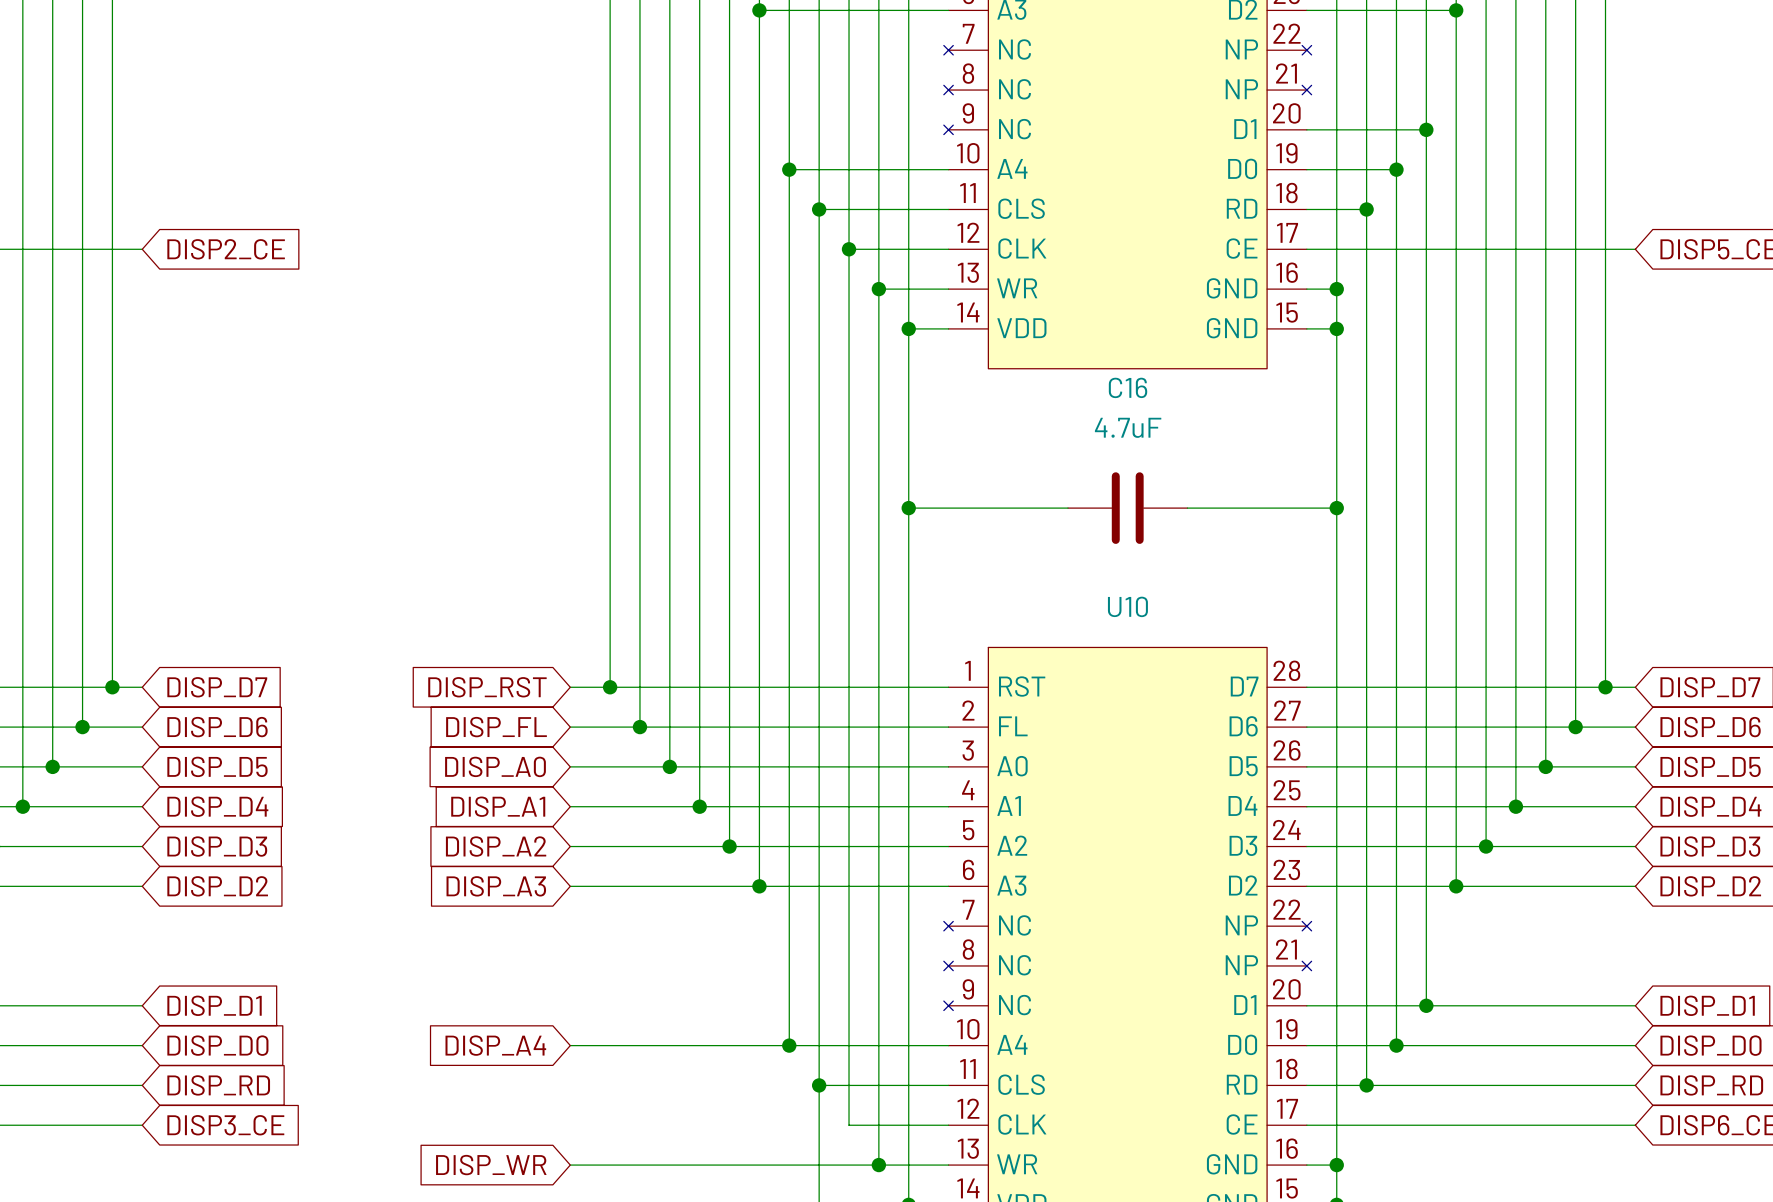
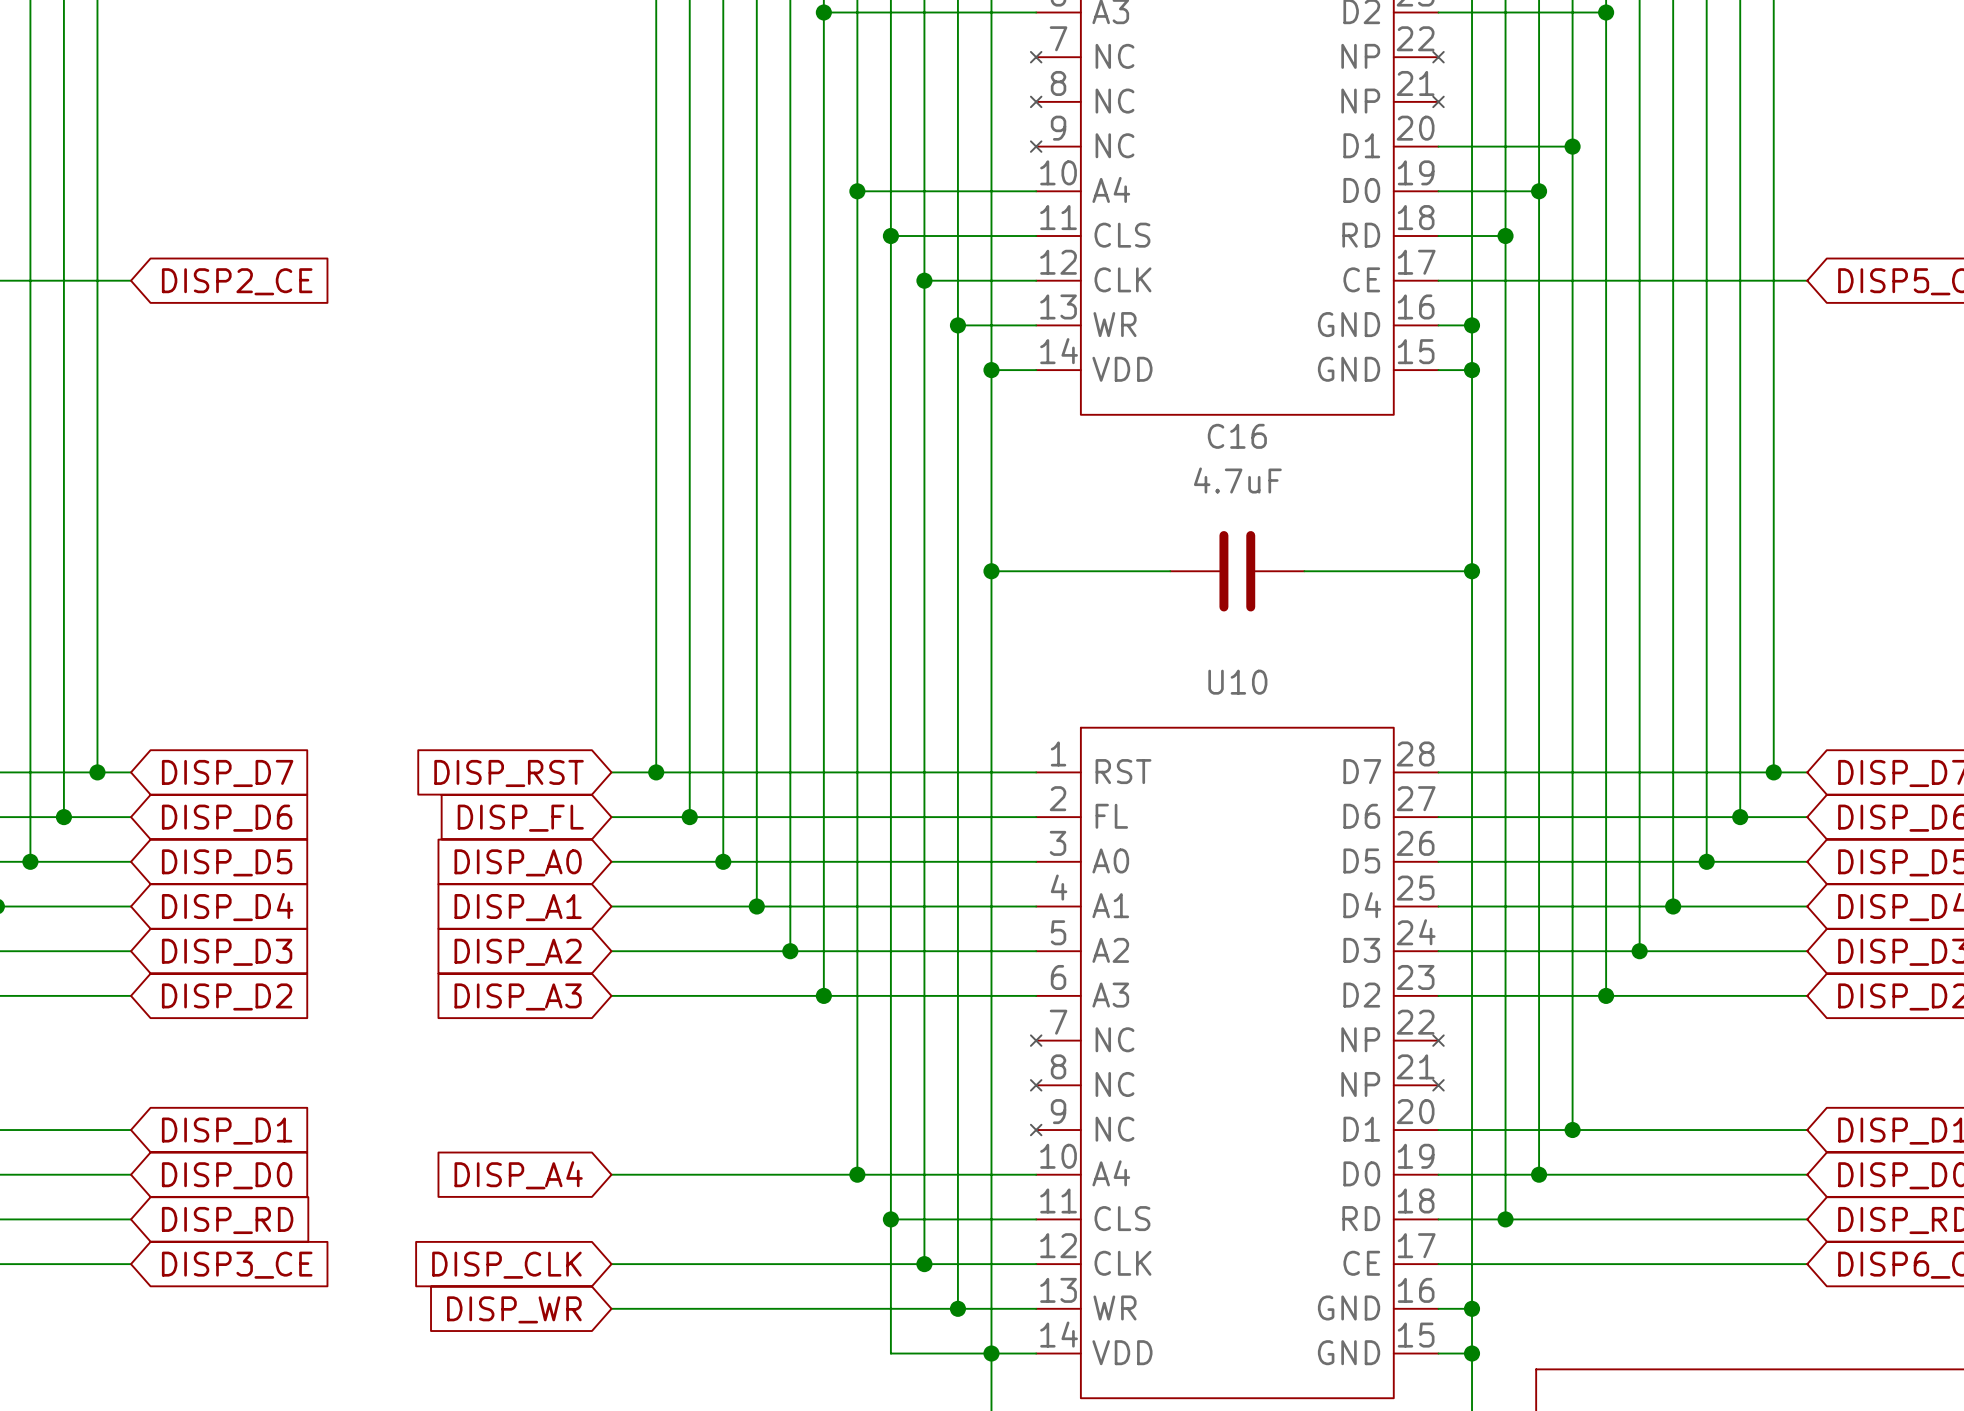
global label: none -> DISP_CLK (506, 1265)
wire: none -> (611, 1264) (924, 1264)
junction: none -> (924, 1264)

